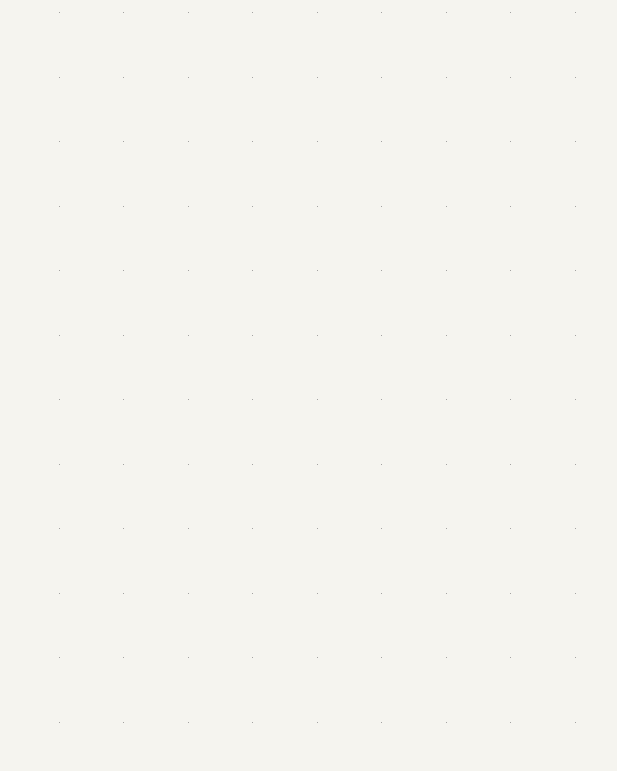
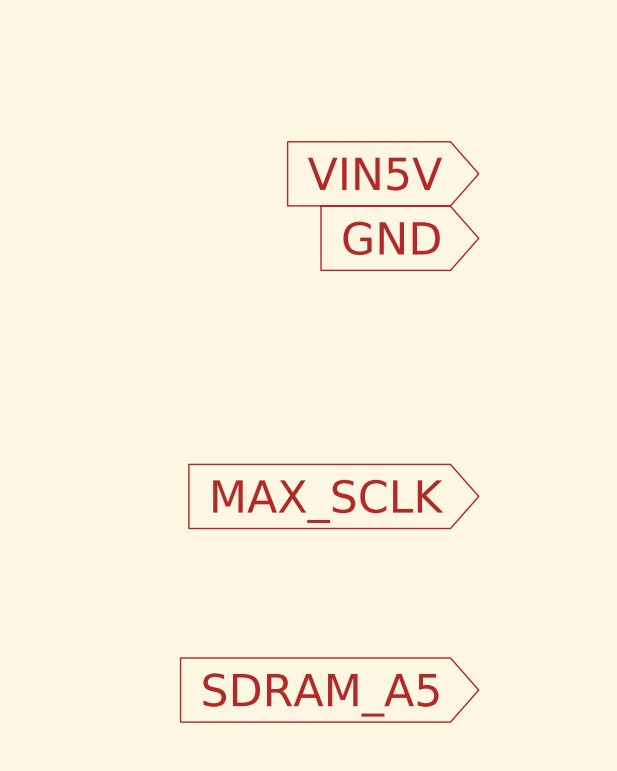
global label: none -> VIN5V (374, 174)
global label: none -> GND (391, 238)
global label: none -> MAX_SCLK (328, 501)
global label: none -> SDRAM_A5 (320, 695)

